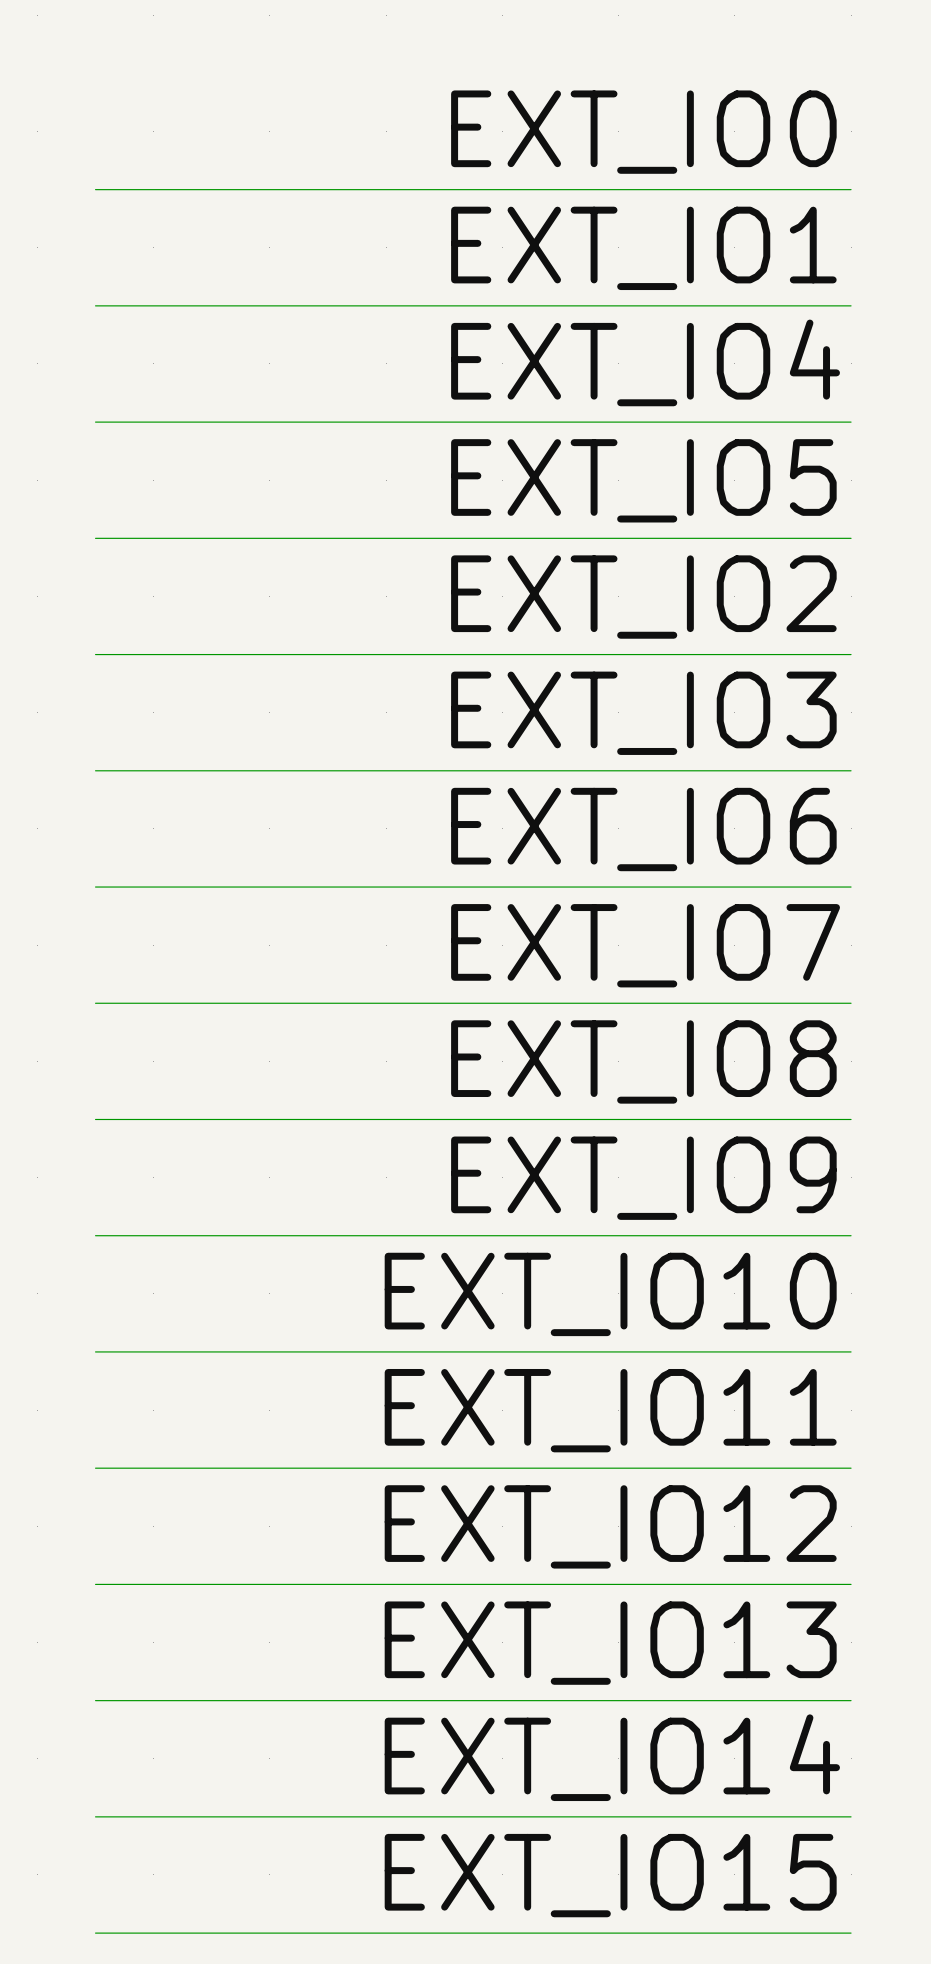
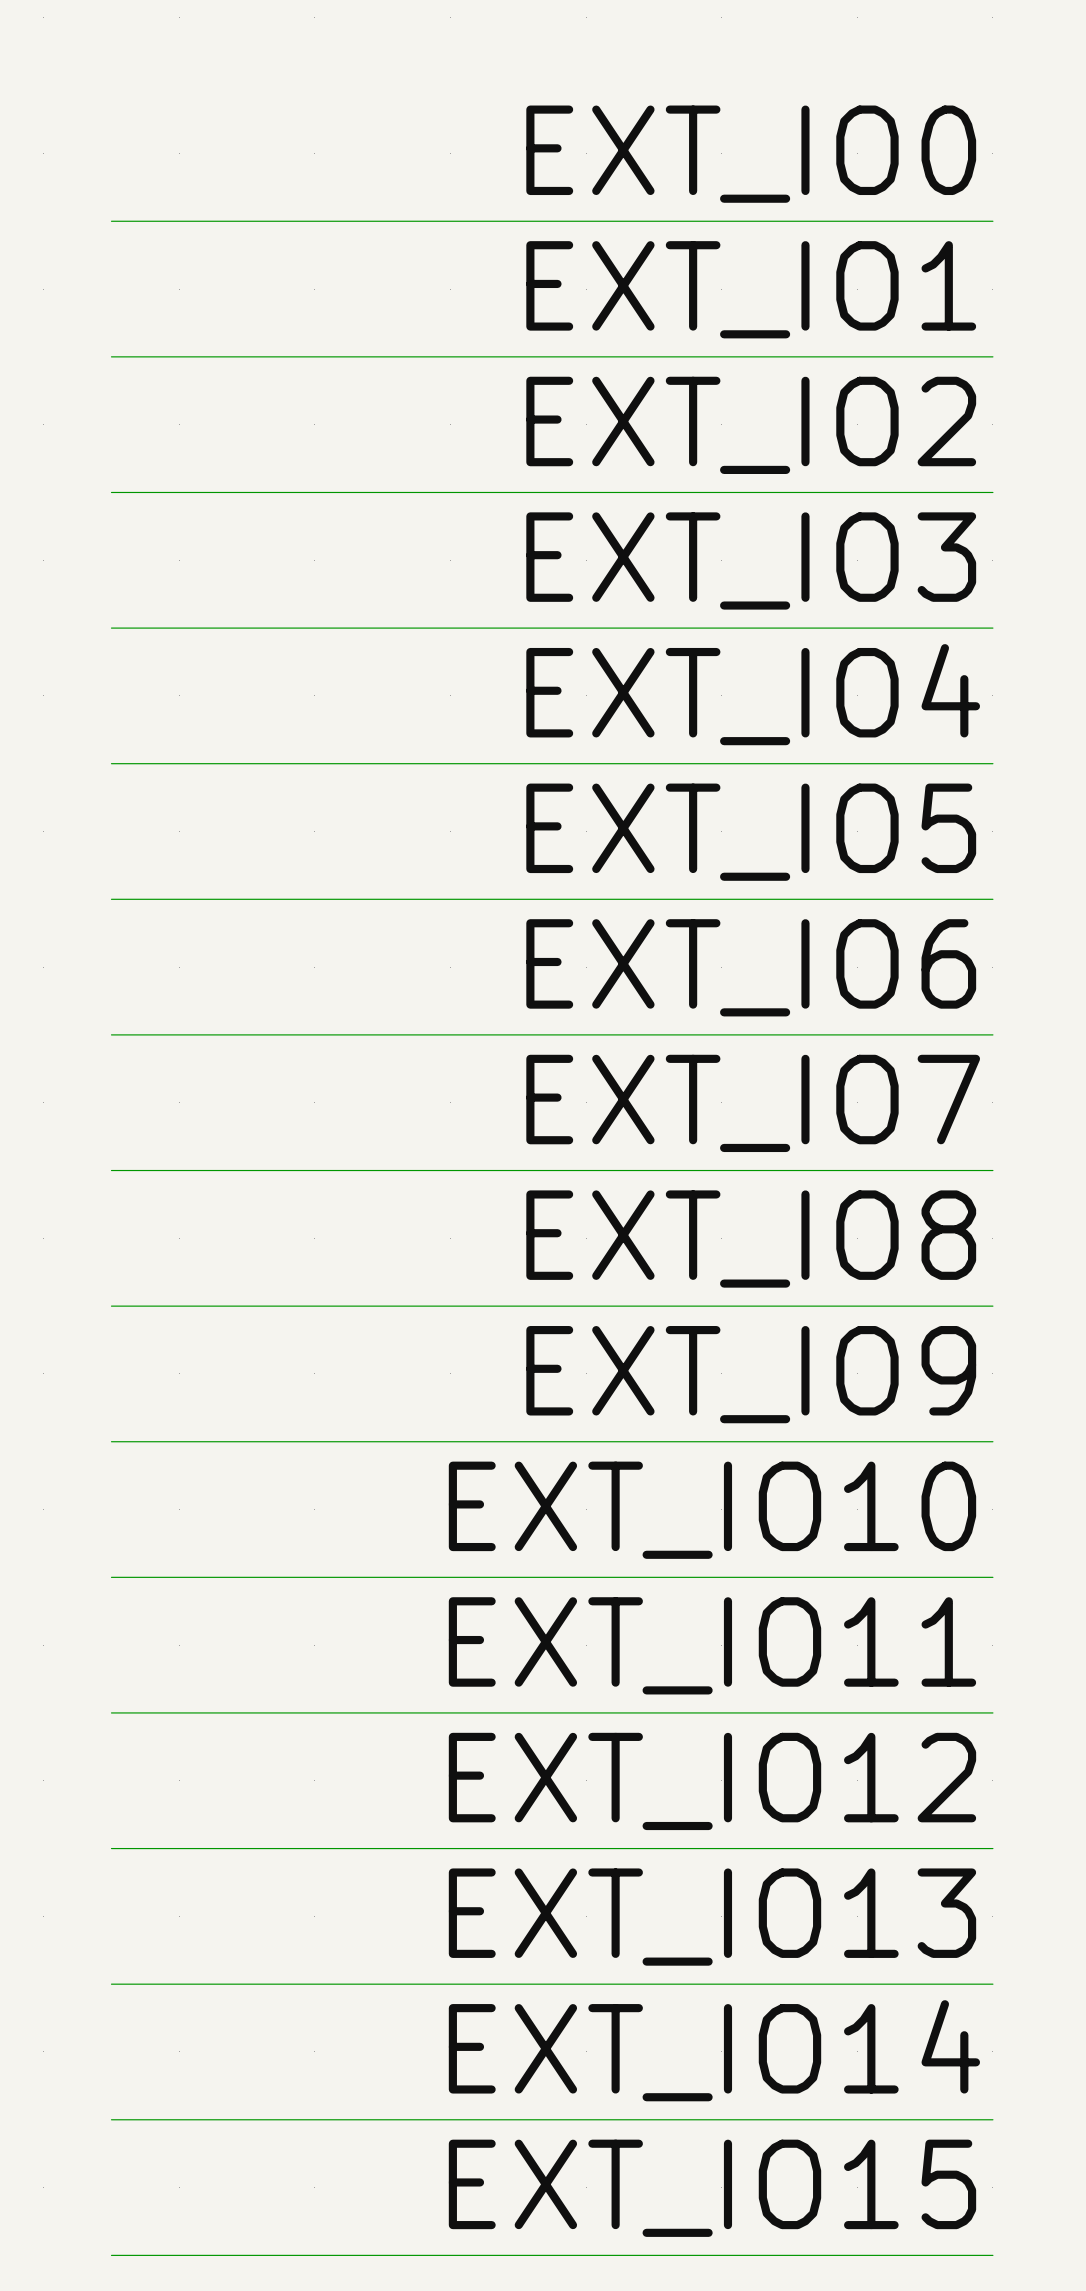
label: EXT_IO4 (645, 362) -> EXT_IO2 (751, 425)
label: EXT_IO5 (643, 480) -> EXT_IO3 (751, 560)
label: EXT_IO2 (643, 597) -> EXT_IO4 (753, 694)
label: EXT_IO3 (643, 713) -> EXT_IO5 (751, 832)

